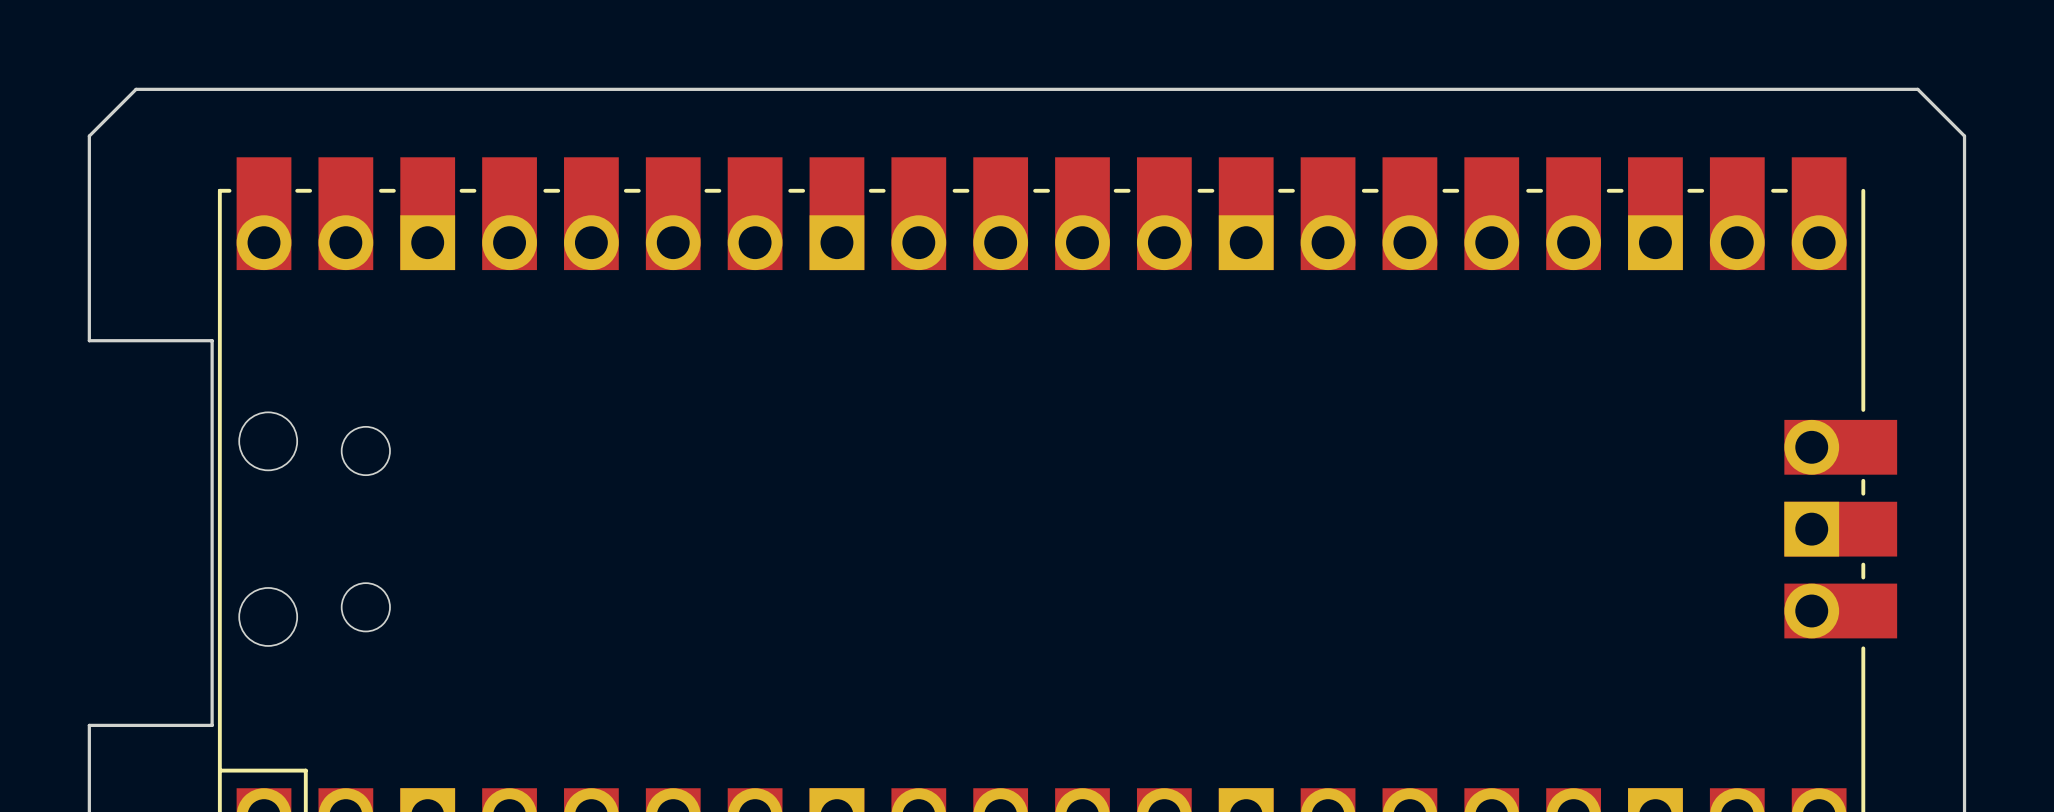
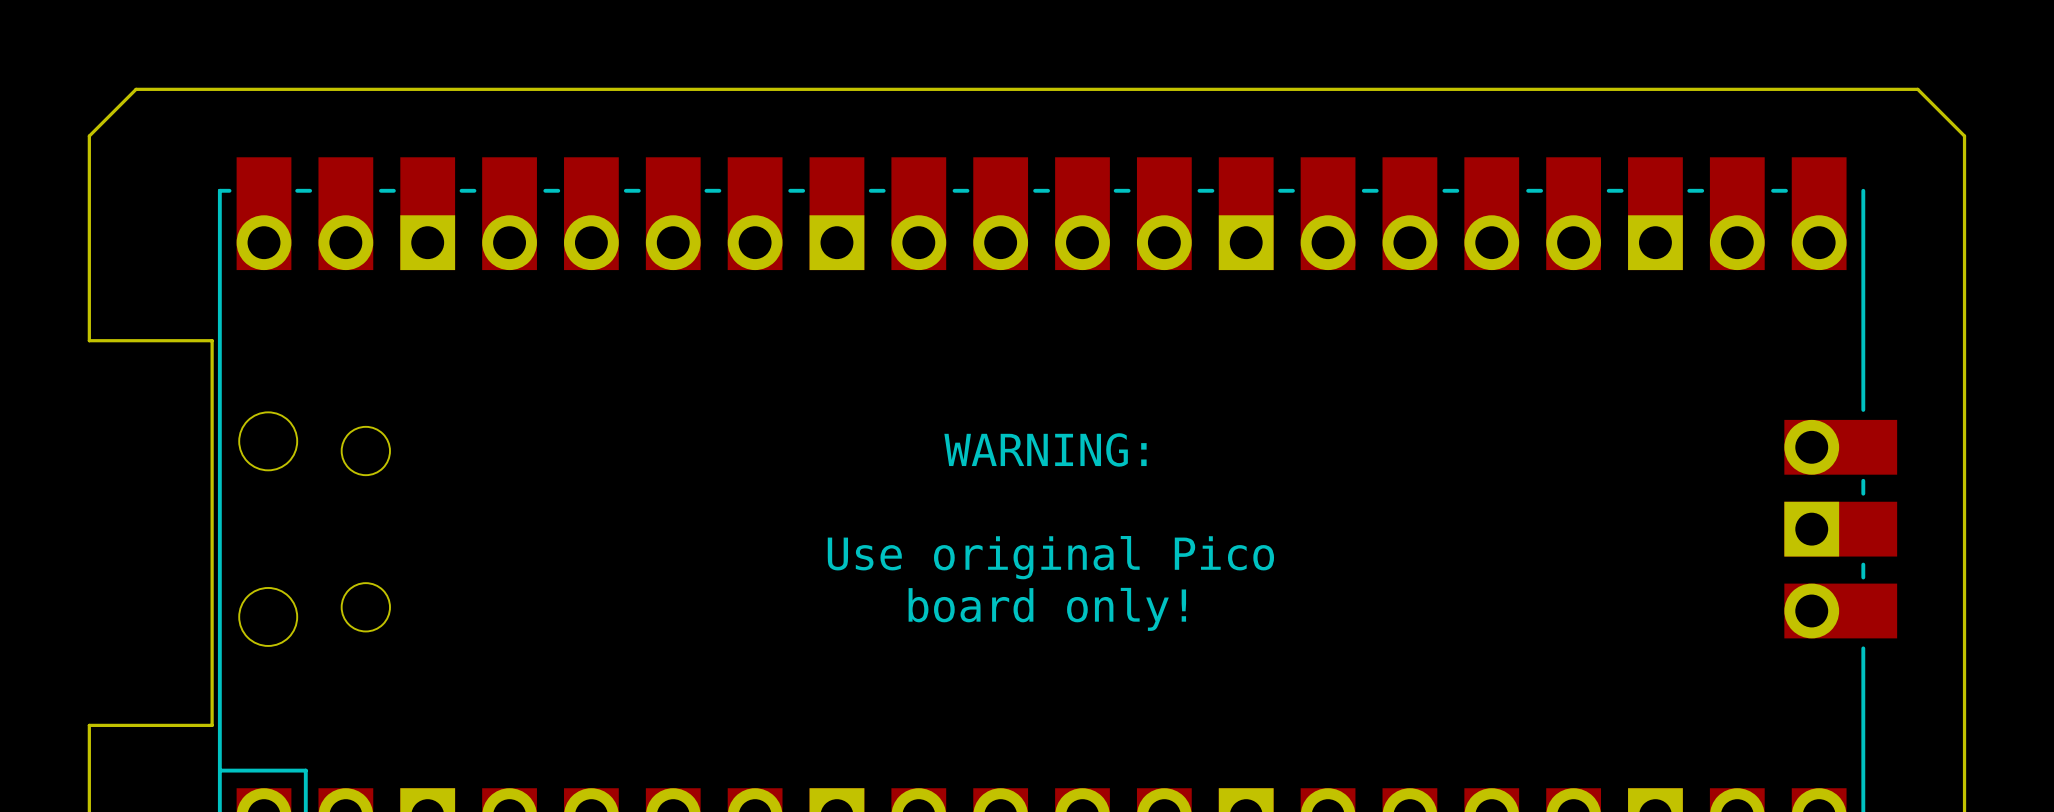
text: none -> WARNING: (1045, 449)
text: none -> Use original Pico (1050, 557)
text: none -> board only! (1047, 609)

